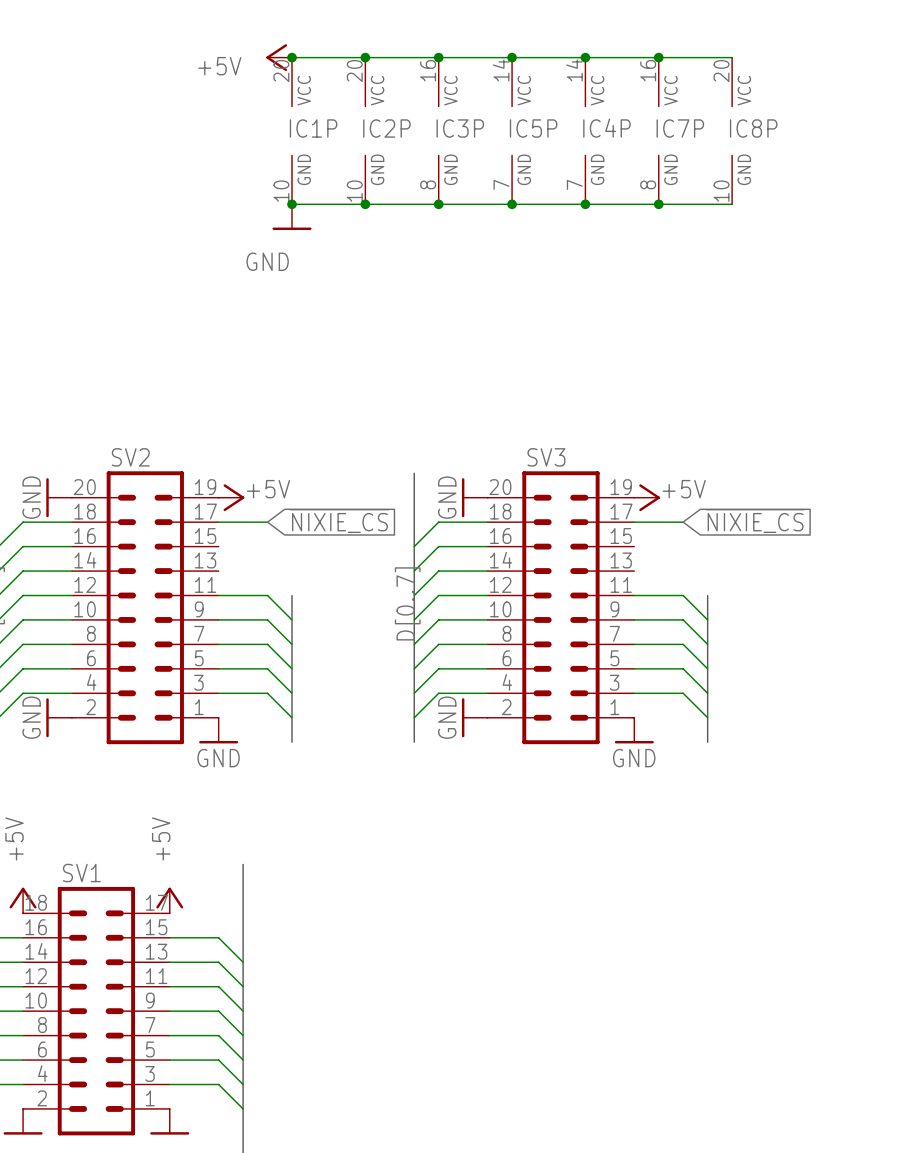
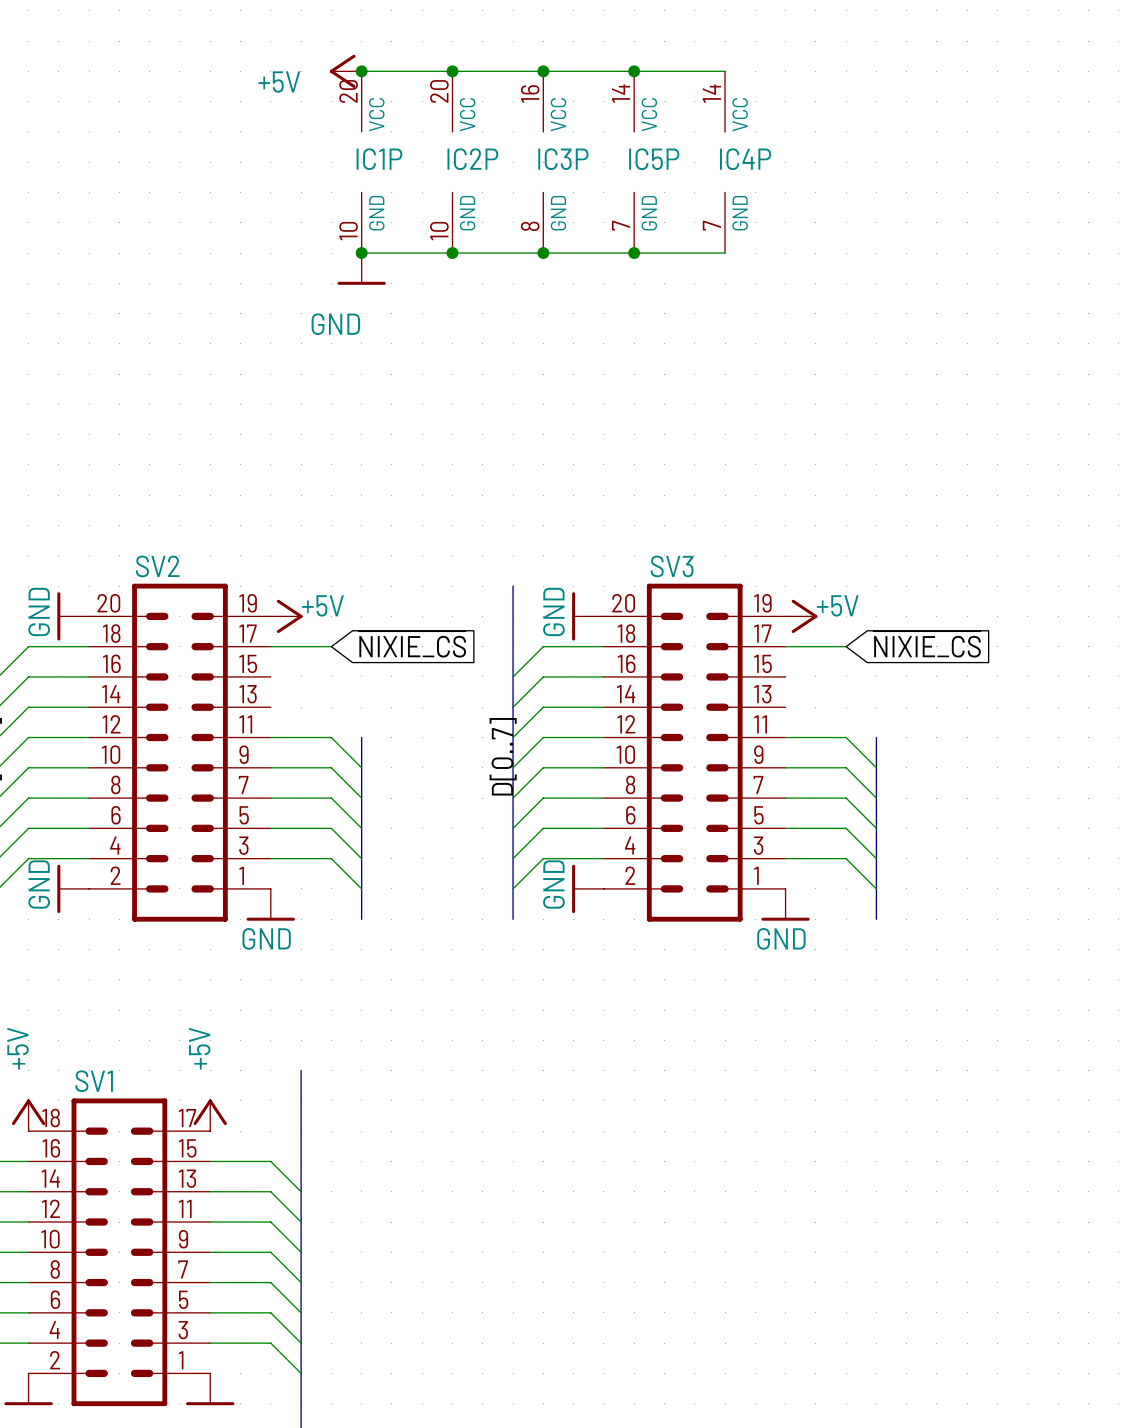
wire: (585, 57) (732, 57) -> none
junction: (585, 57) -> none
junction: (658, 57) -> none
IC7P: (658, 130) -> none
IC8P: (732, 130) -> none
wire: (585, 204) (732, 204) -> none
junction: (585, 204) -> none
junction: (658, 204) -> none

